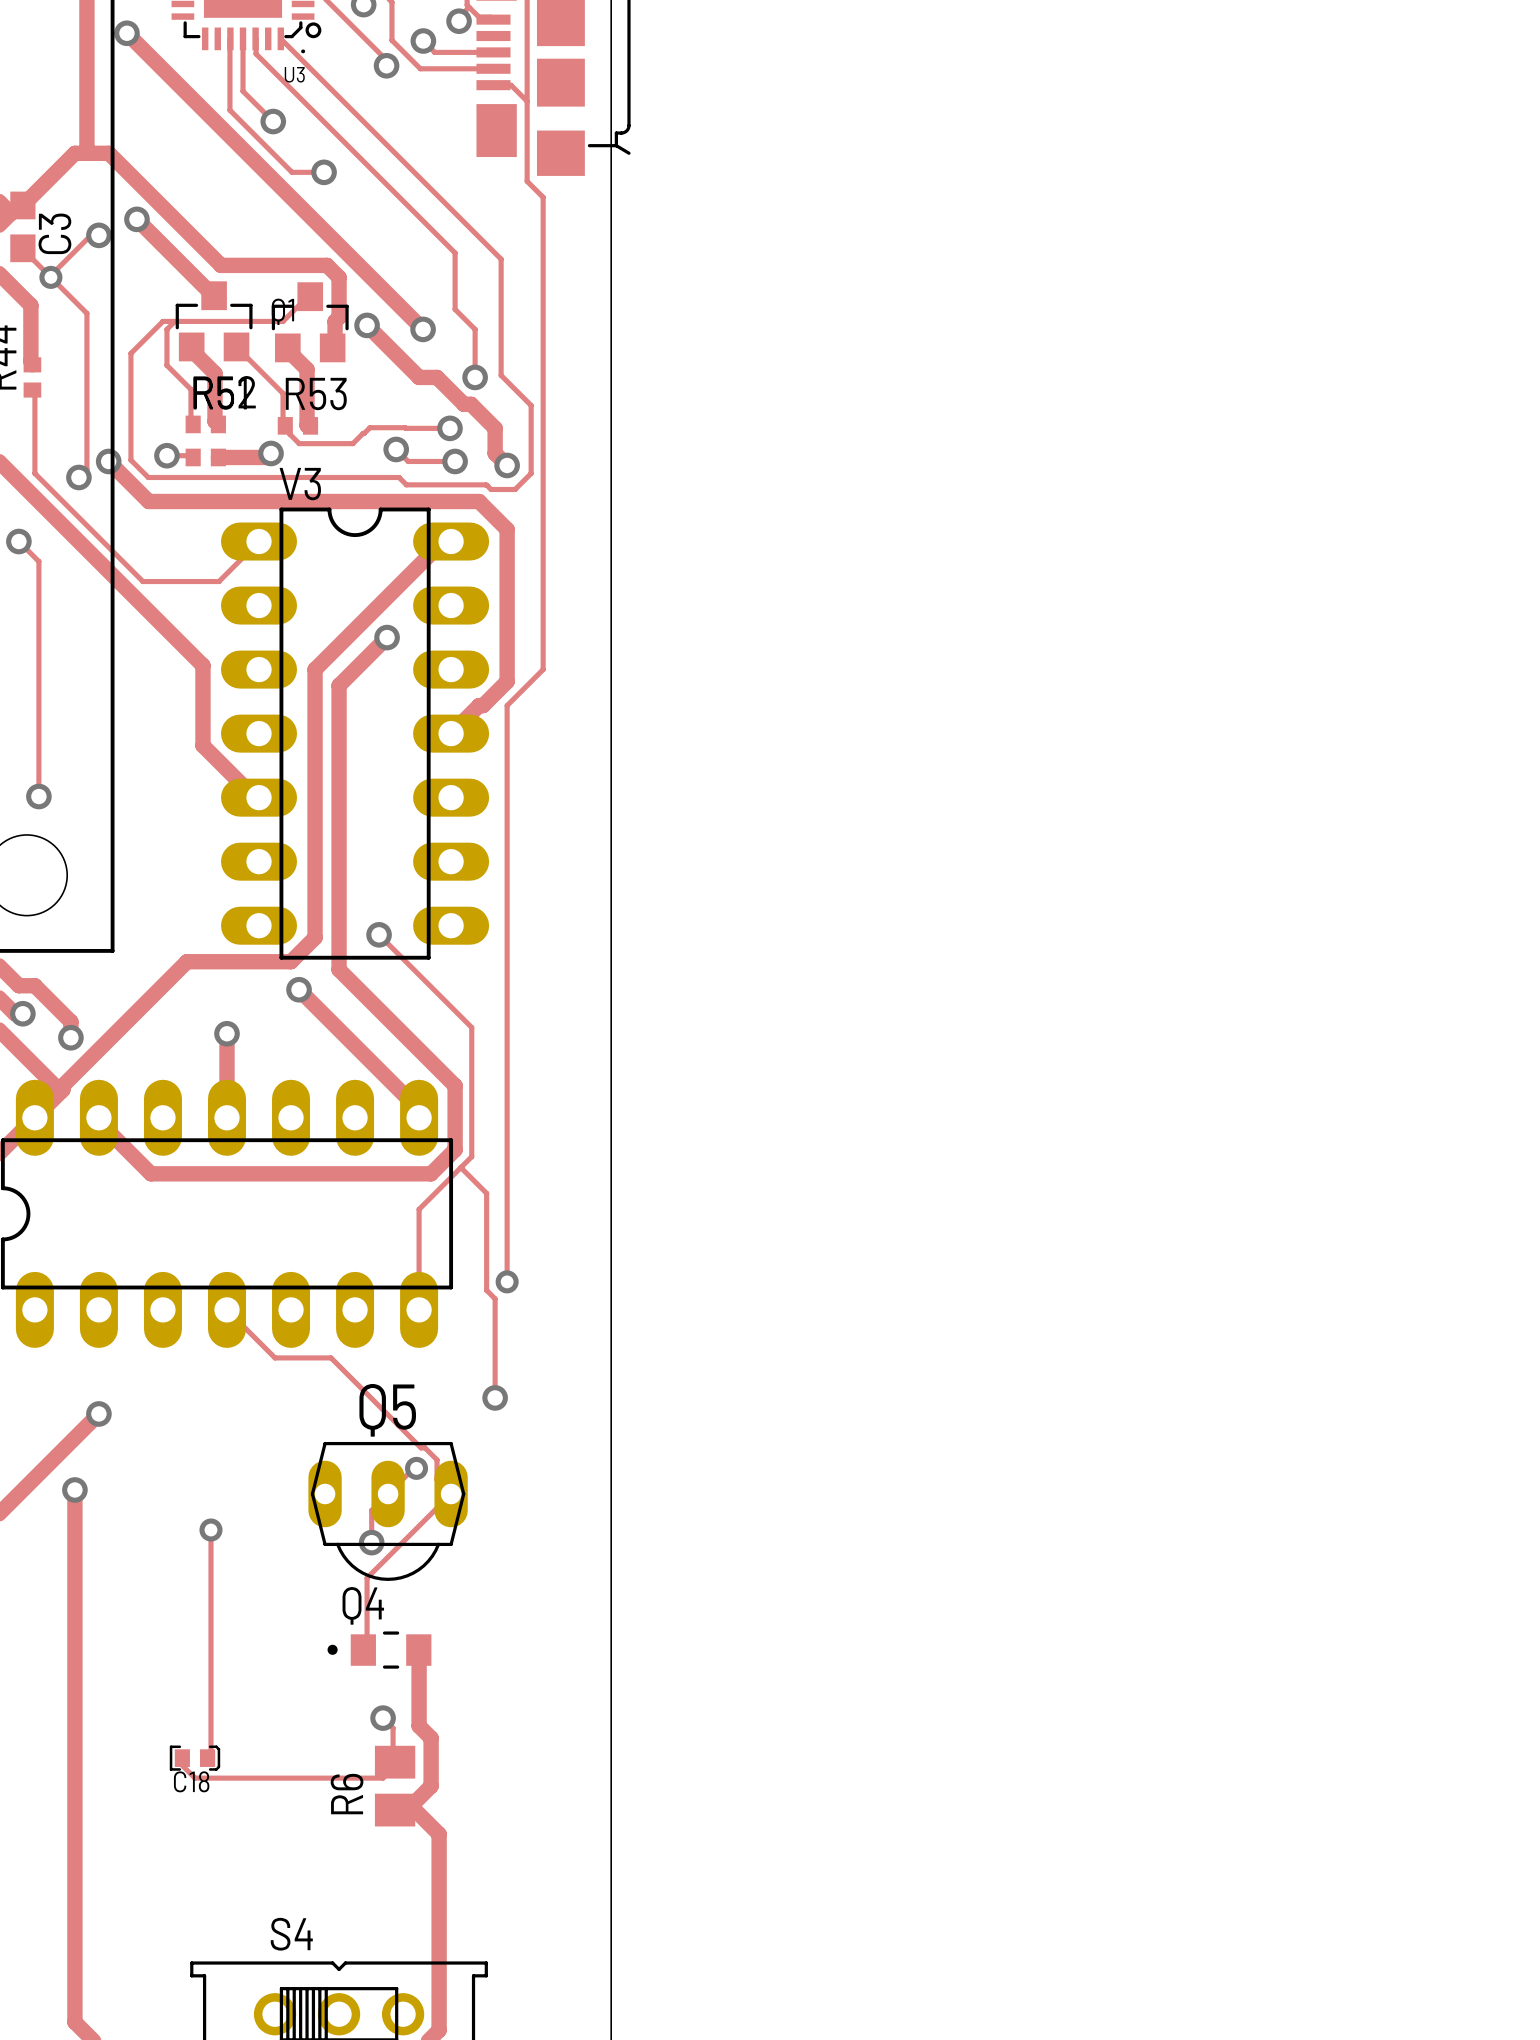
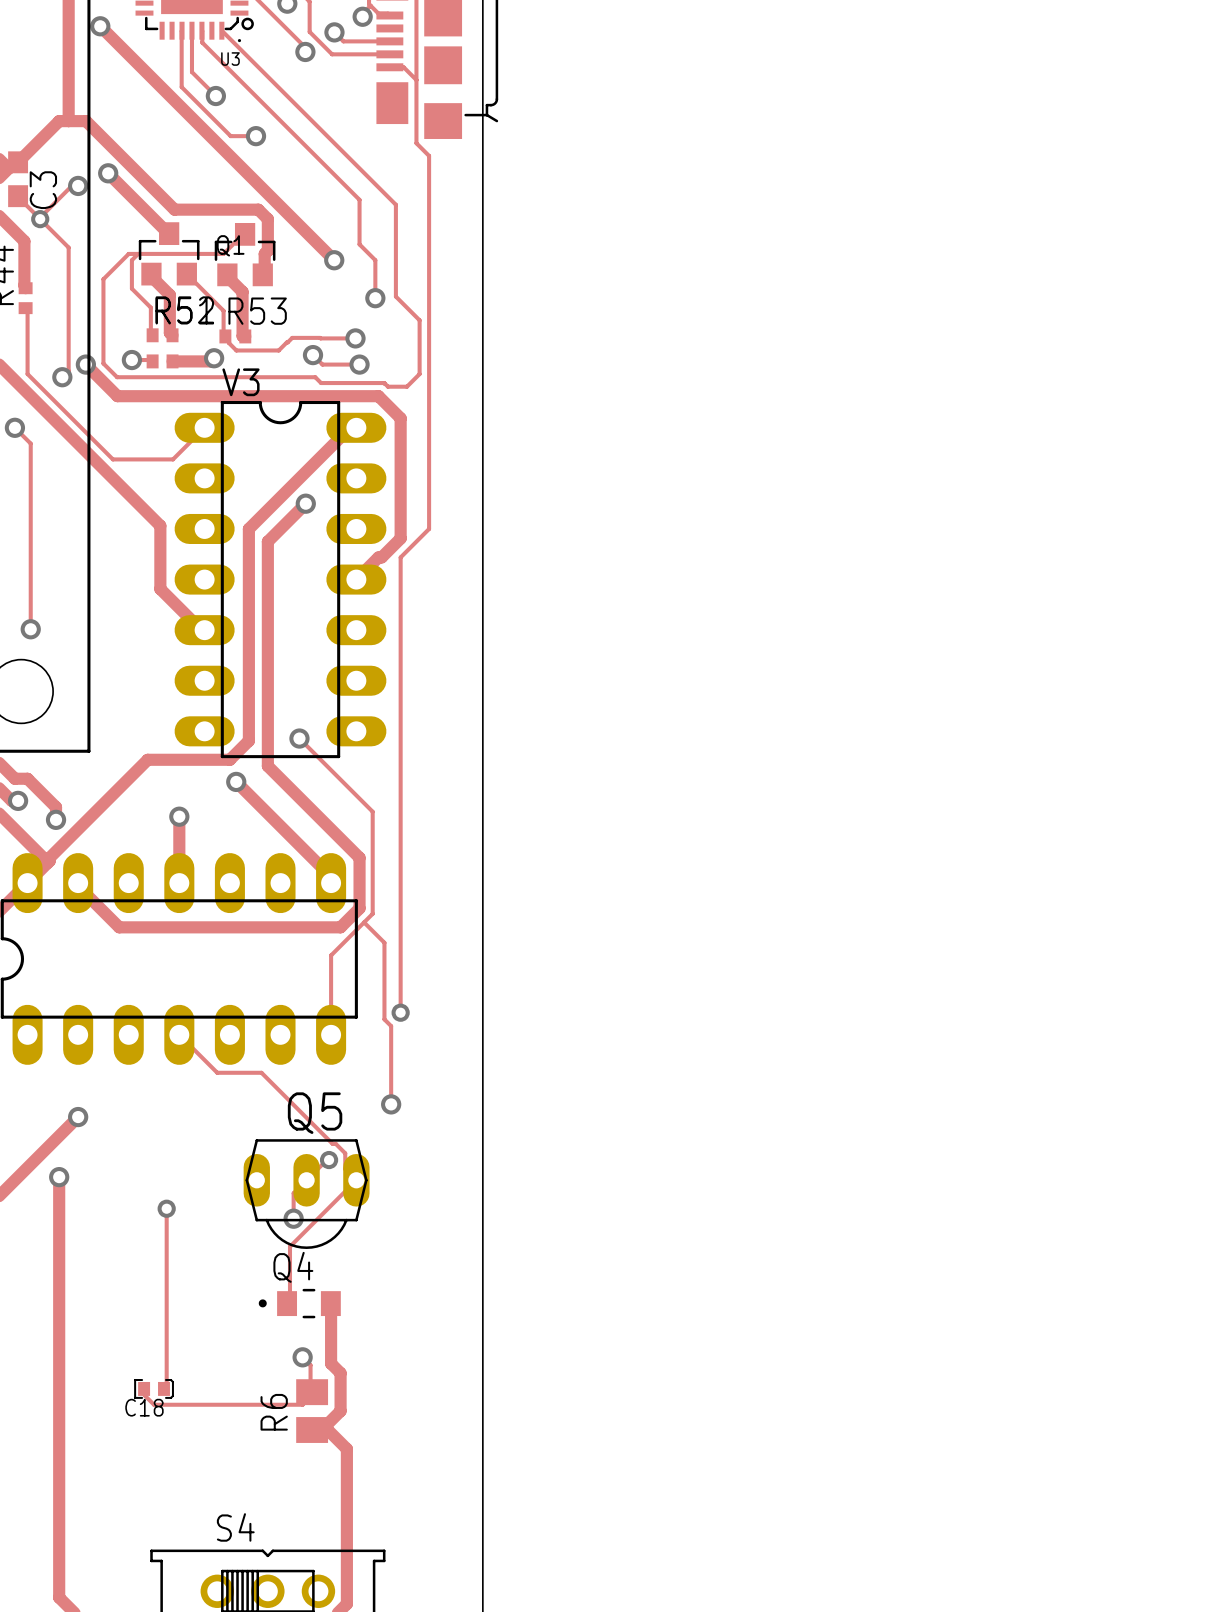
track: (367, 325) (419, 377) (437, 377) (463, 404) (471, 404) (495, 428) (495, 453) (507, 465) -> none
via: (367, 325) -> none
via: (507, 465) -> none

